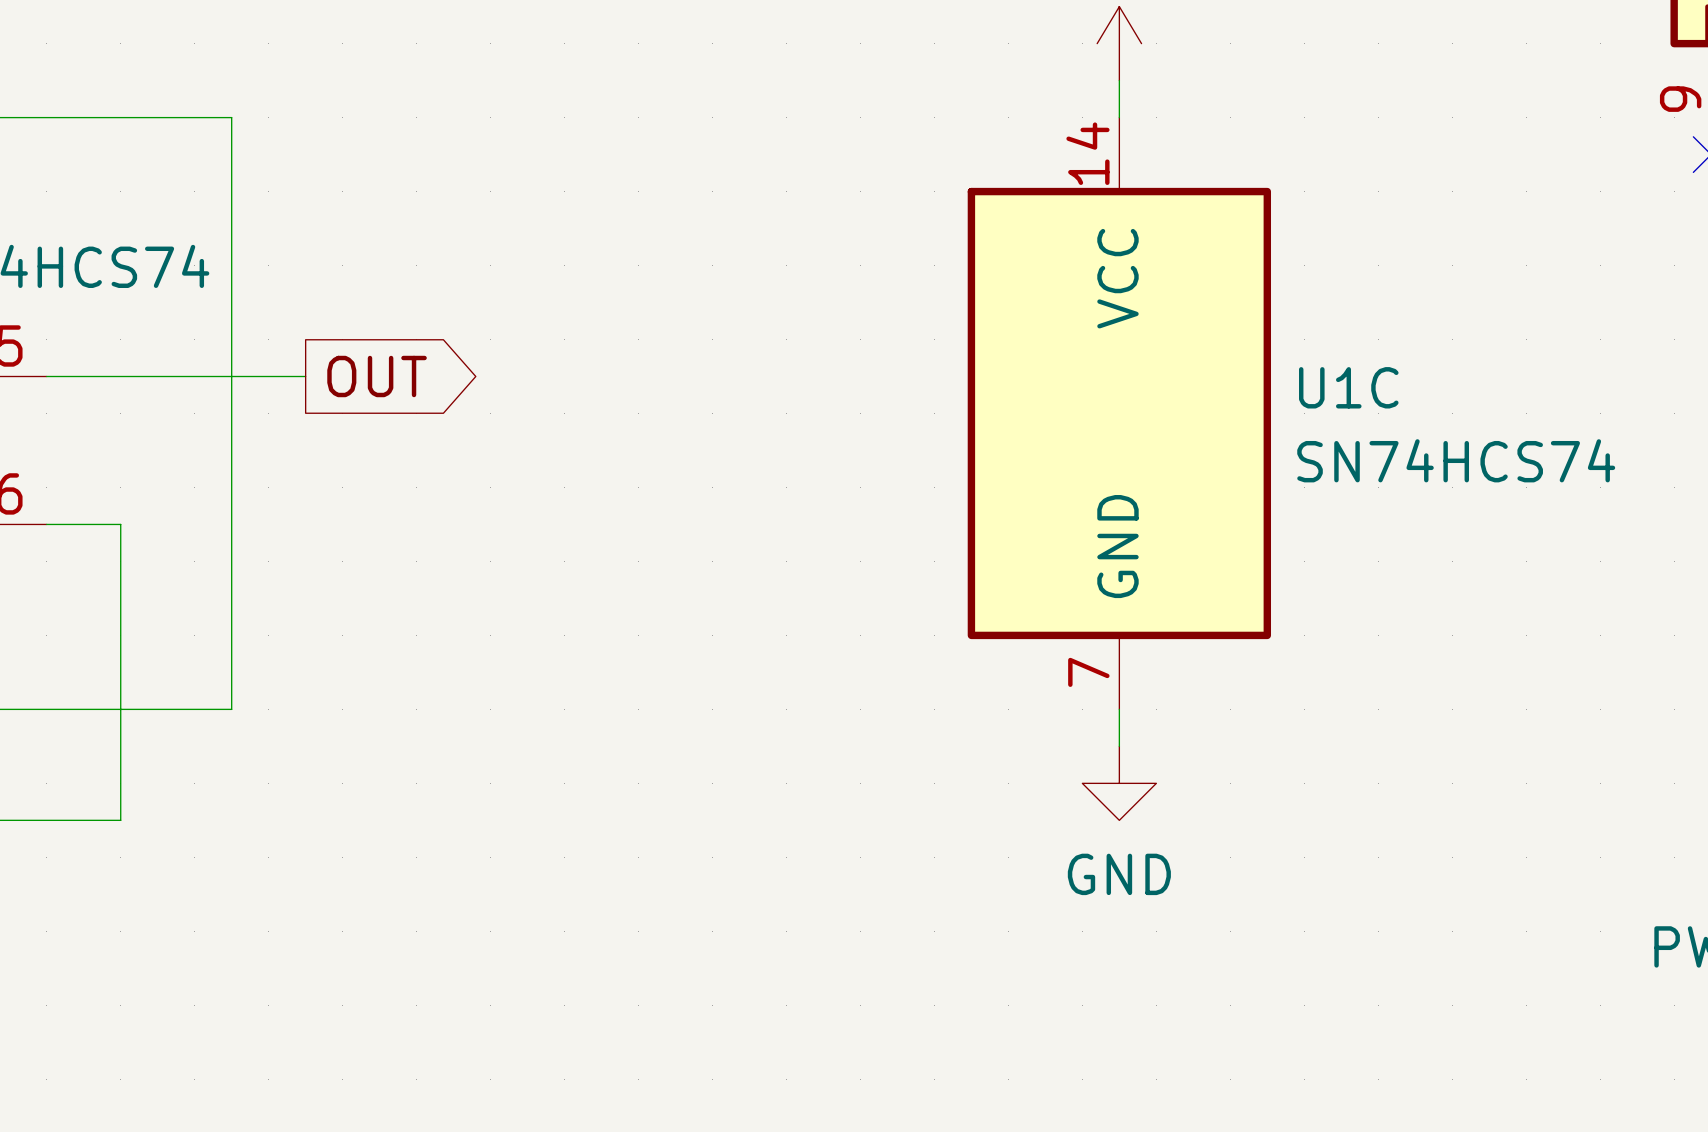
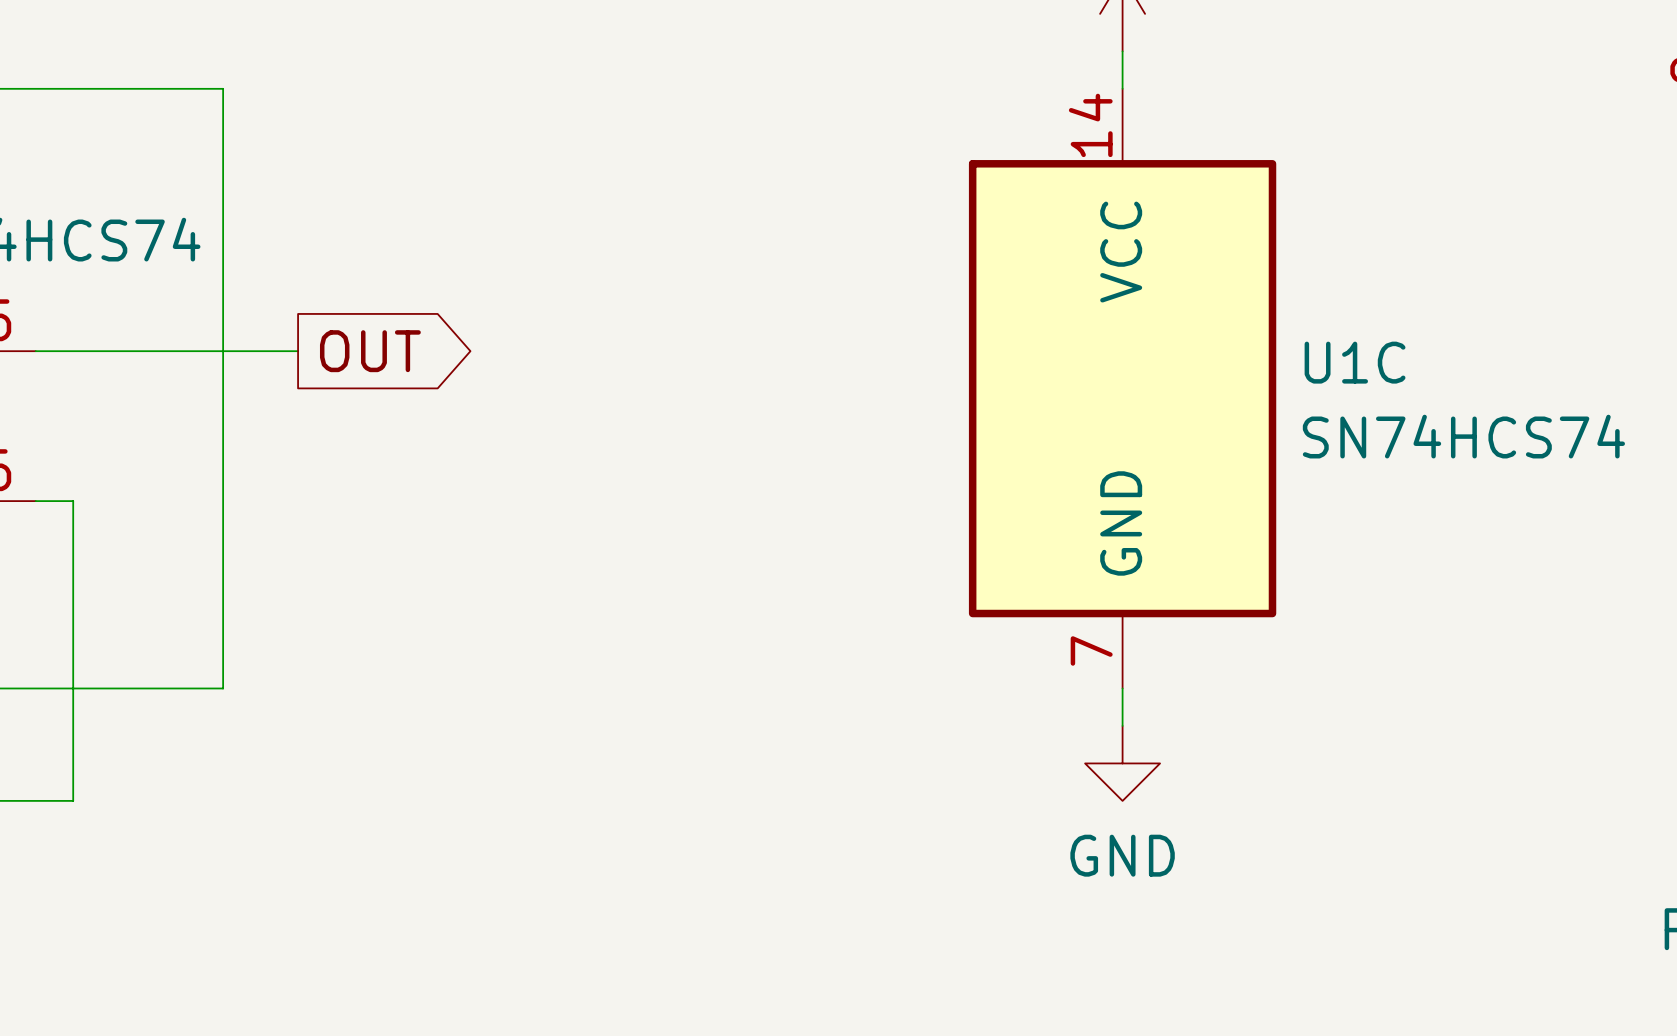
wire: (83, 524) (120, 524) (120, 820) (83, 820) -> (73, 501) (73, 800)

